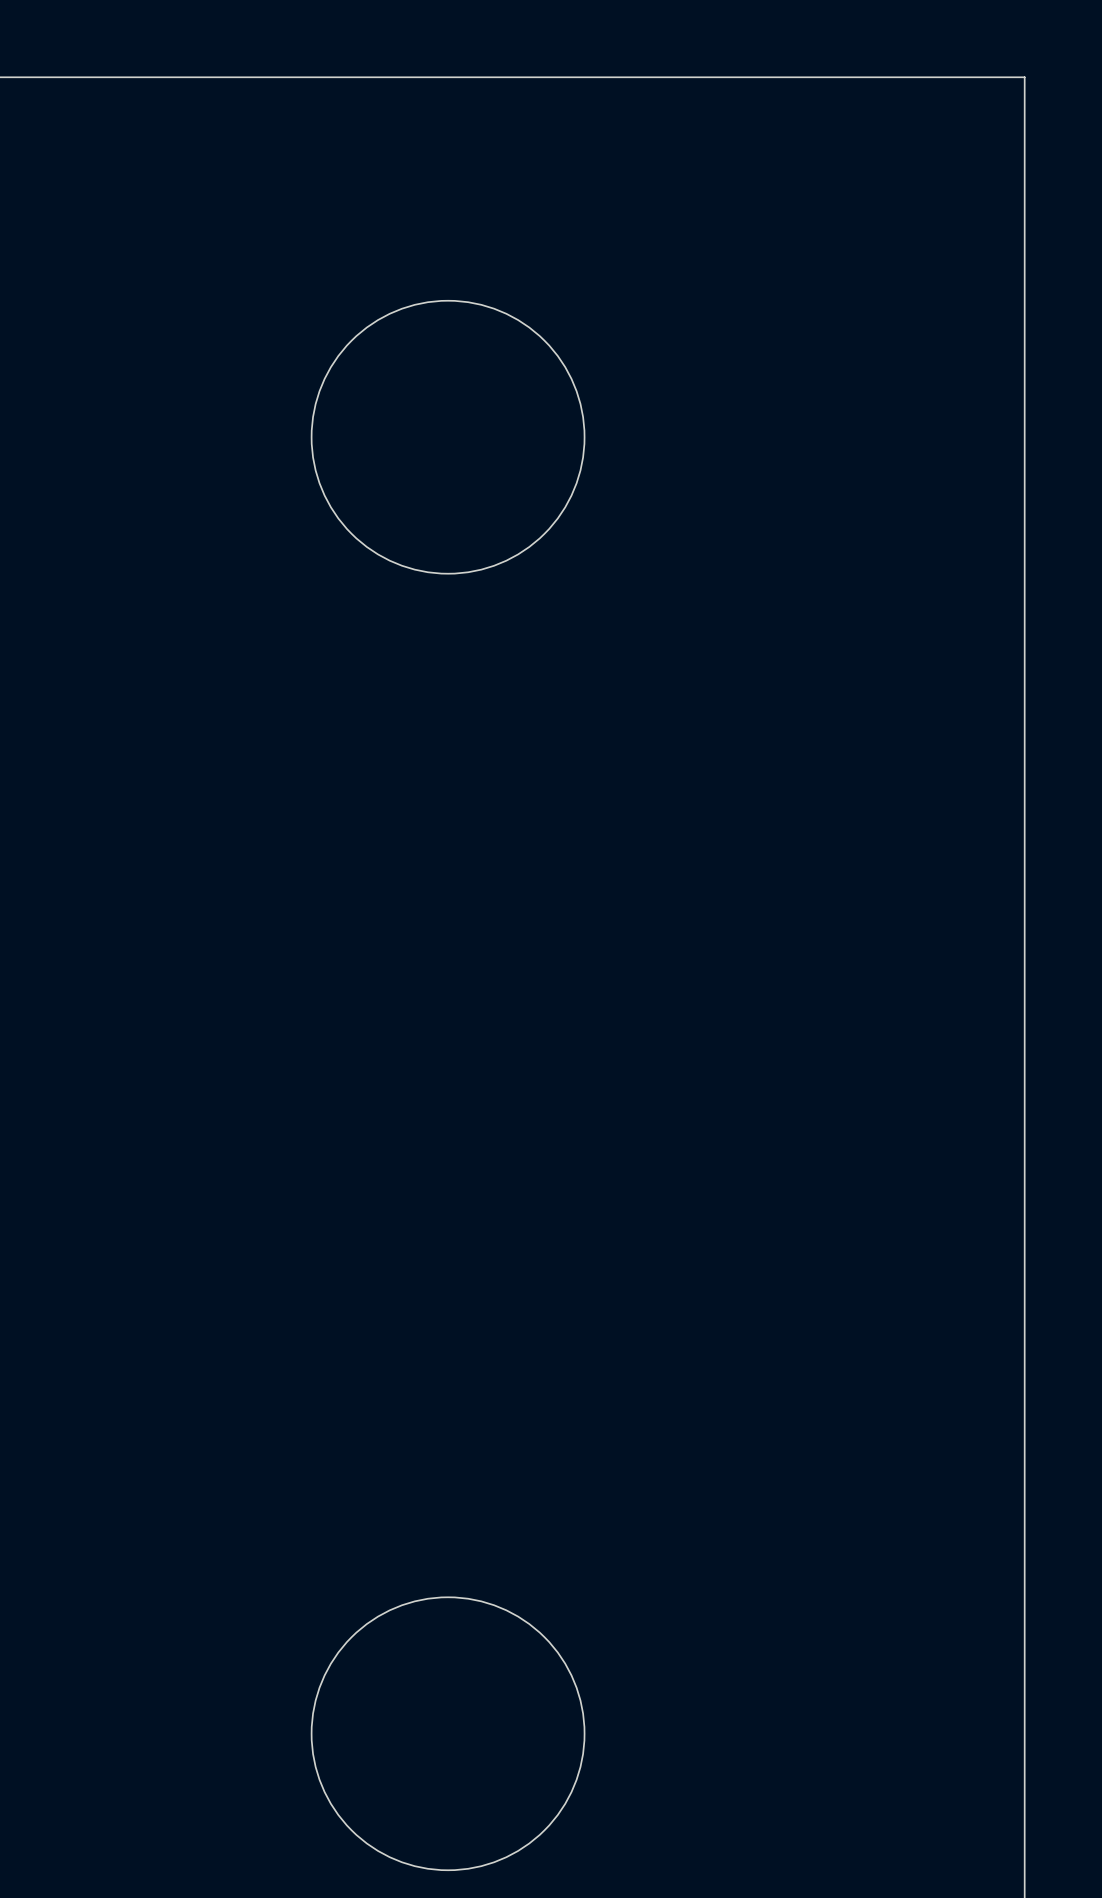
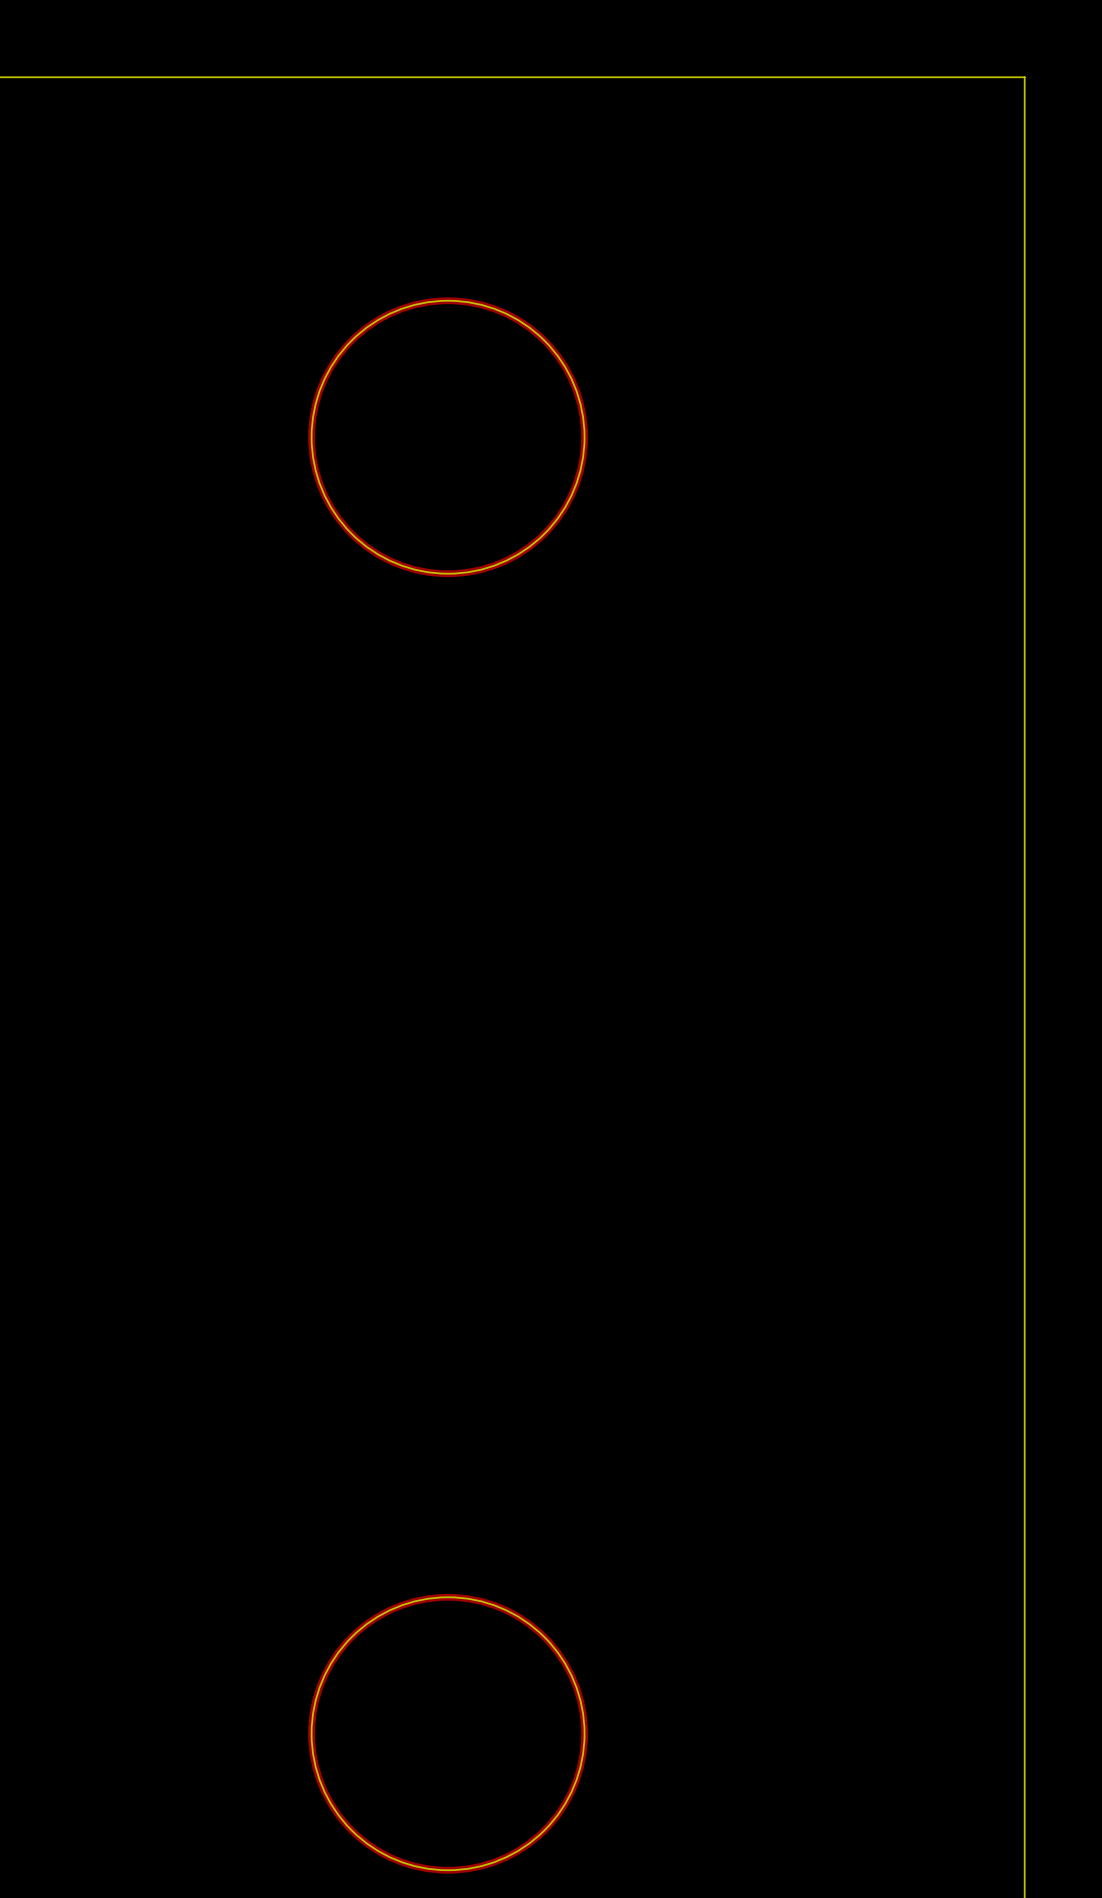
drawing: none -> [308, 297, 588, 578]
drawing: none -> [308, 1593, 588, 1874]

